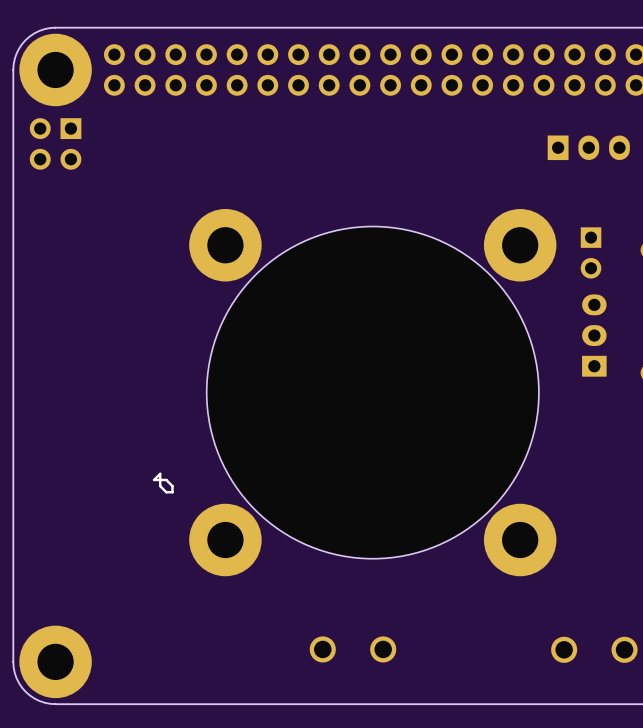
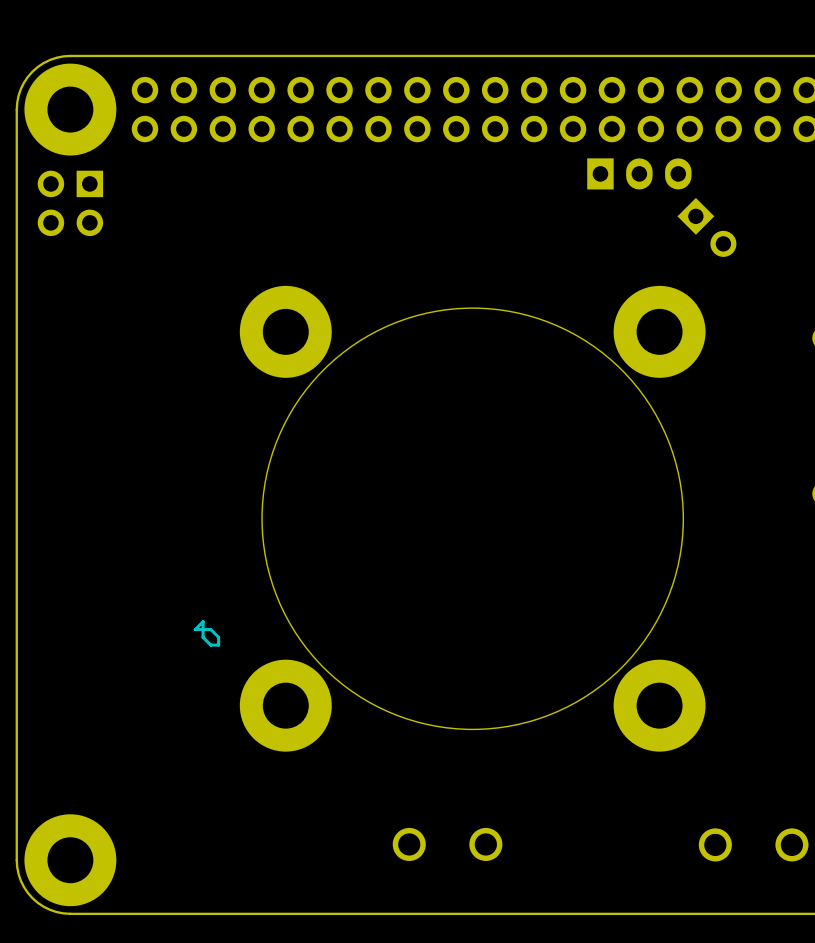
part position: (588, 147) -> (639, 173)
part: none -> (706, 227)
part: (591, 252) -> none
part: (594, 335) -> none

